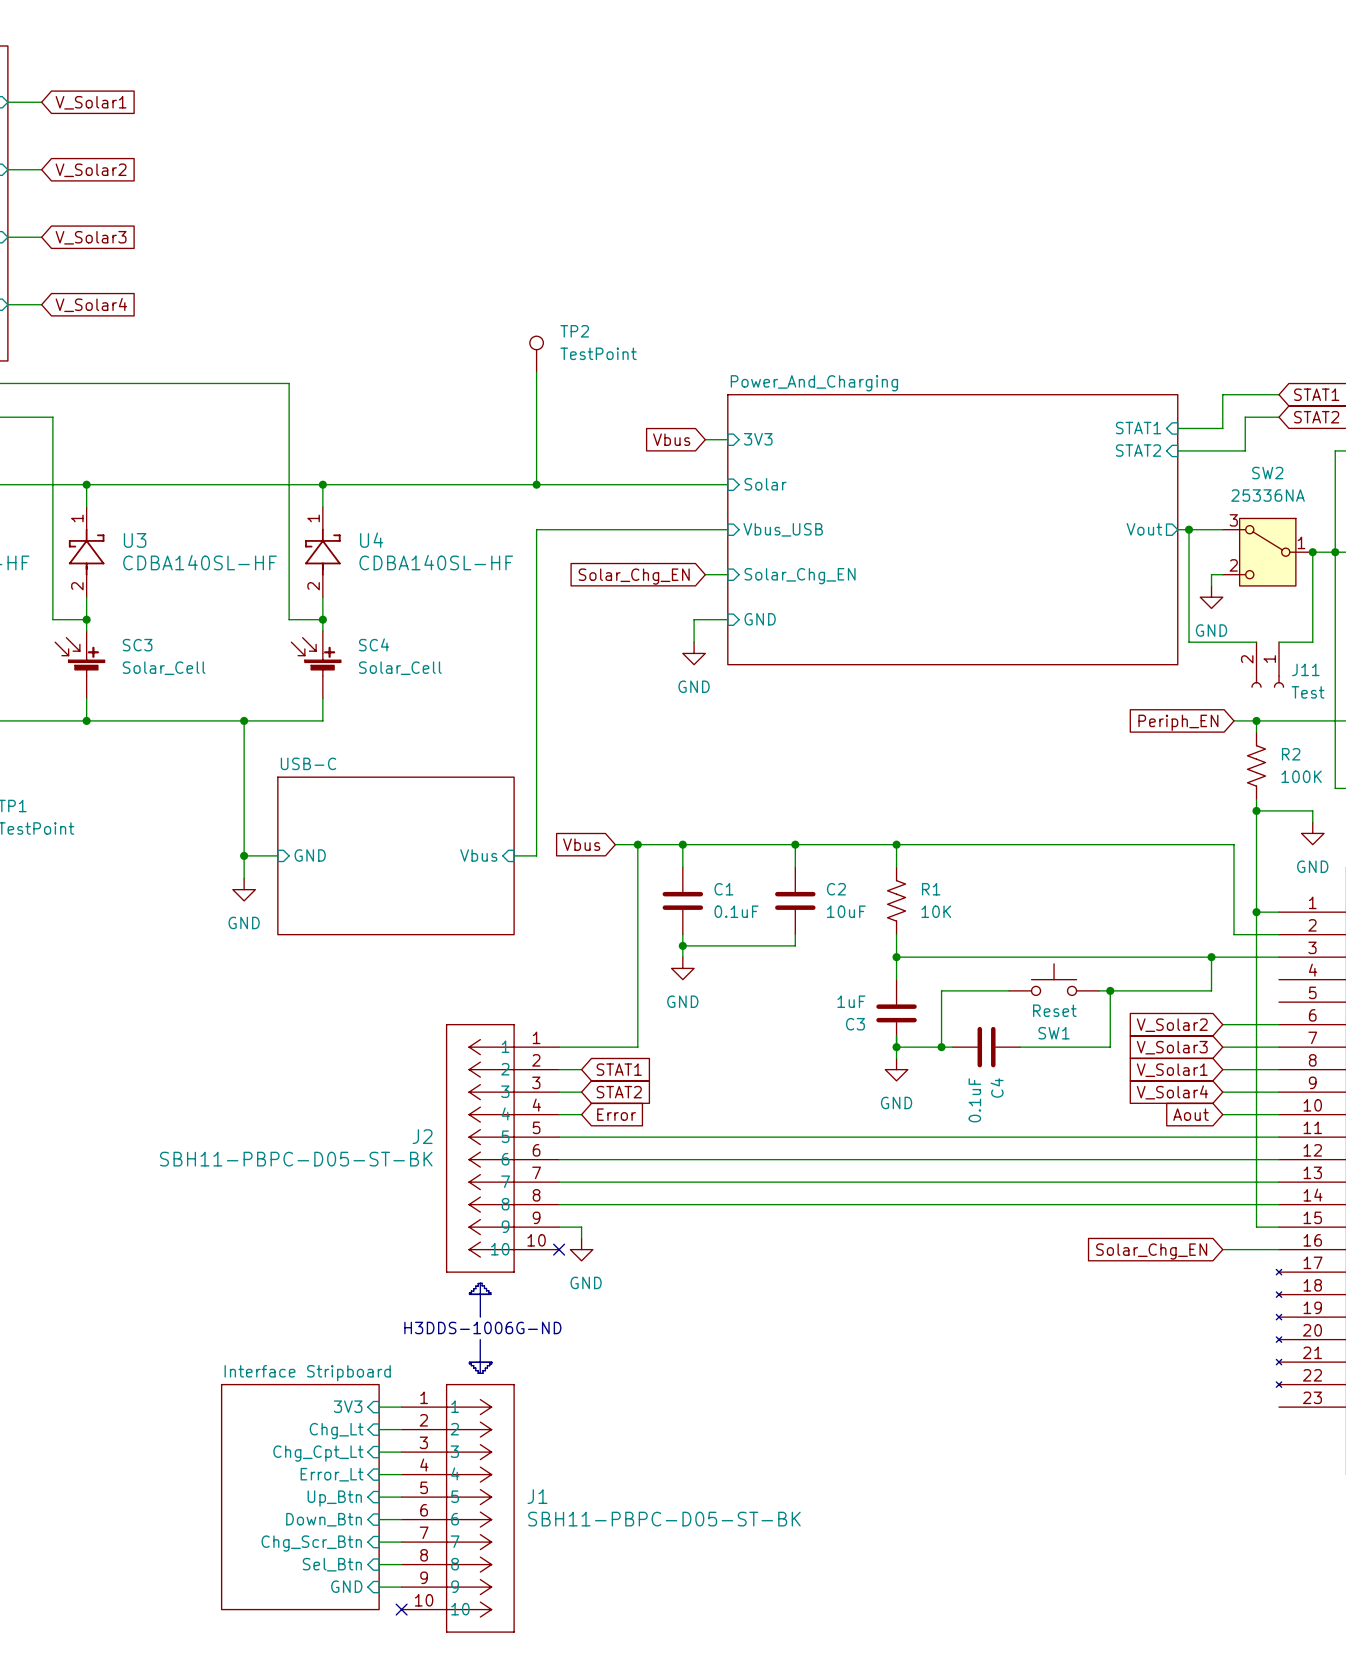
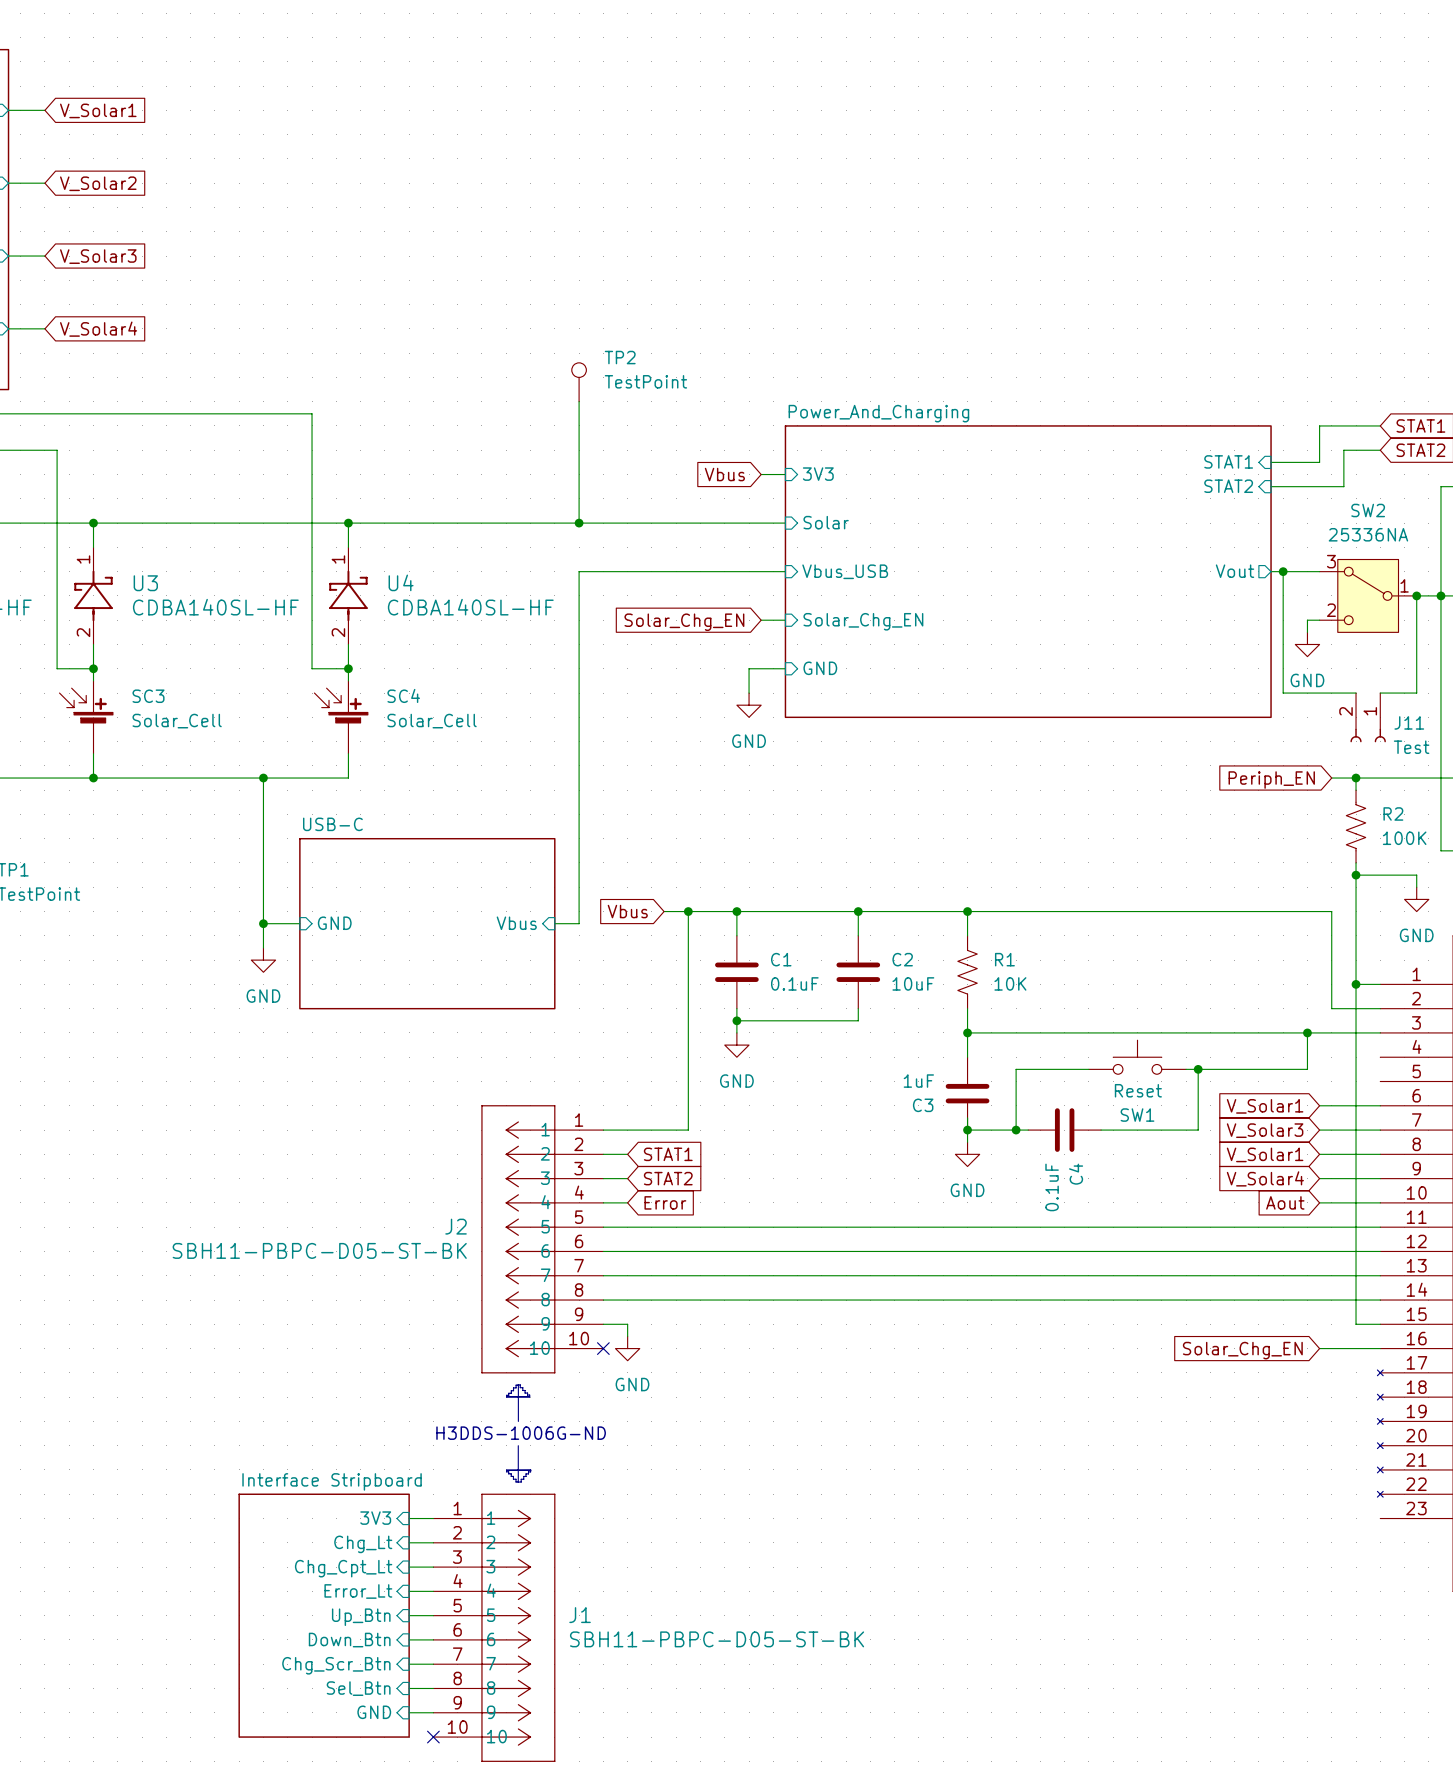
global label: V_Solar2 (1172, 1025) -> V_Solar1 (1265, 1106)

